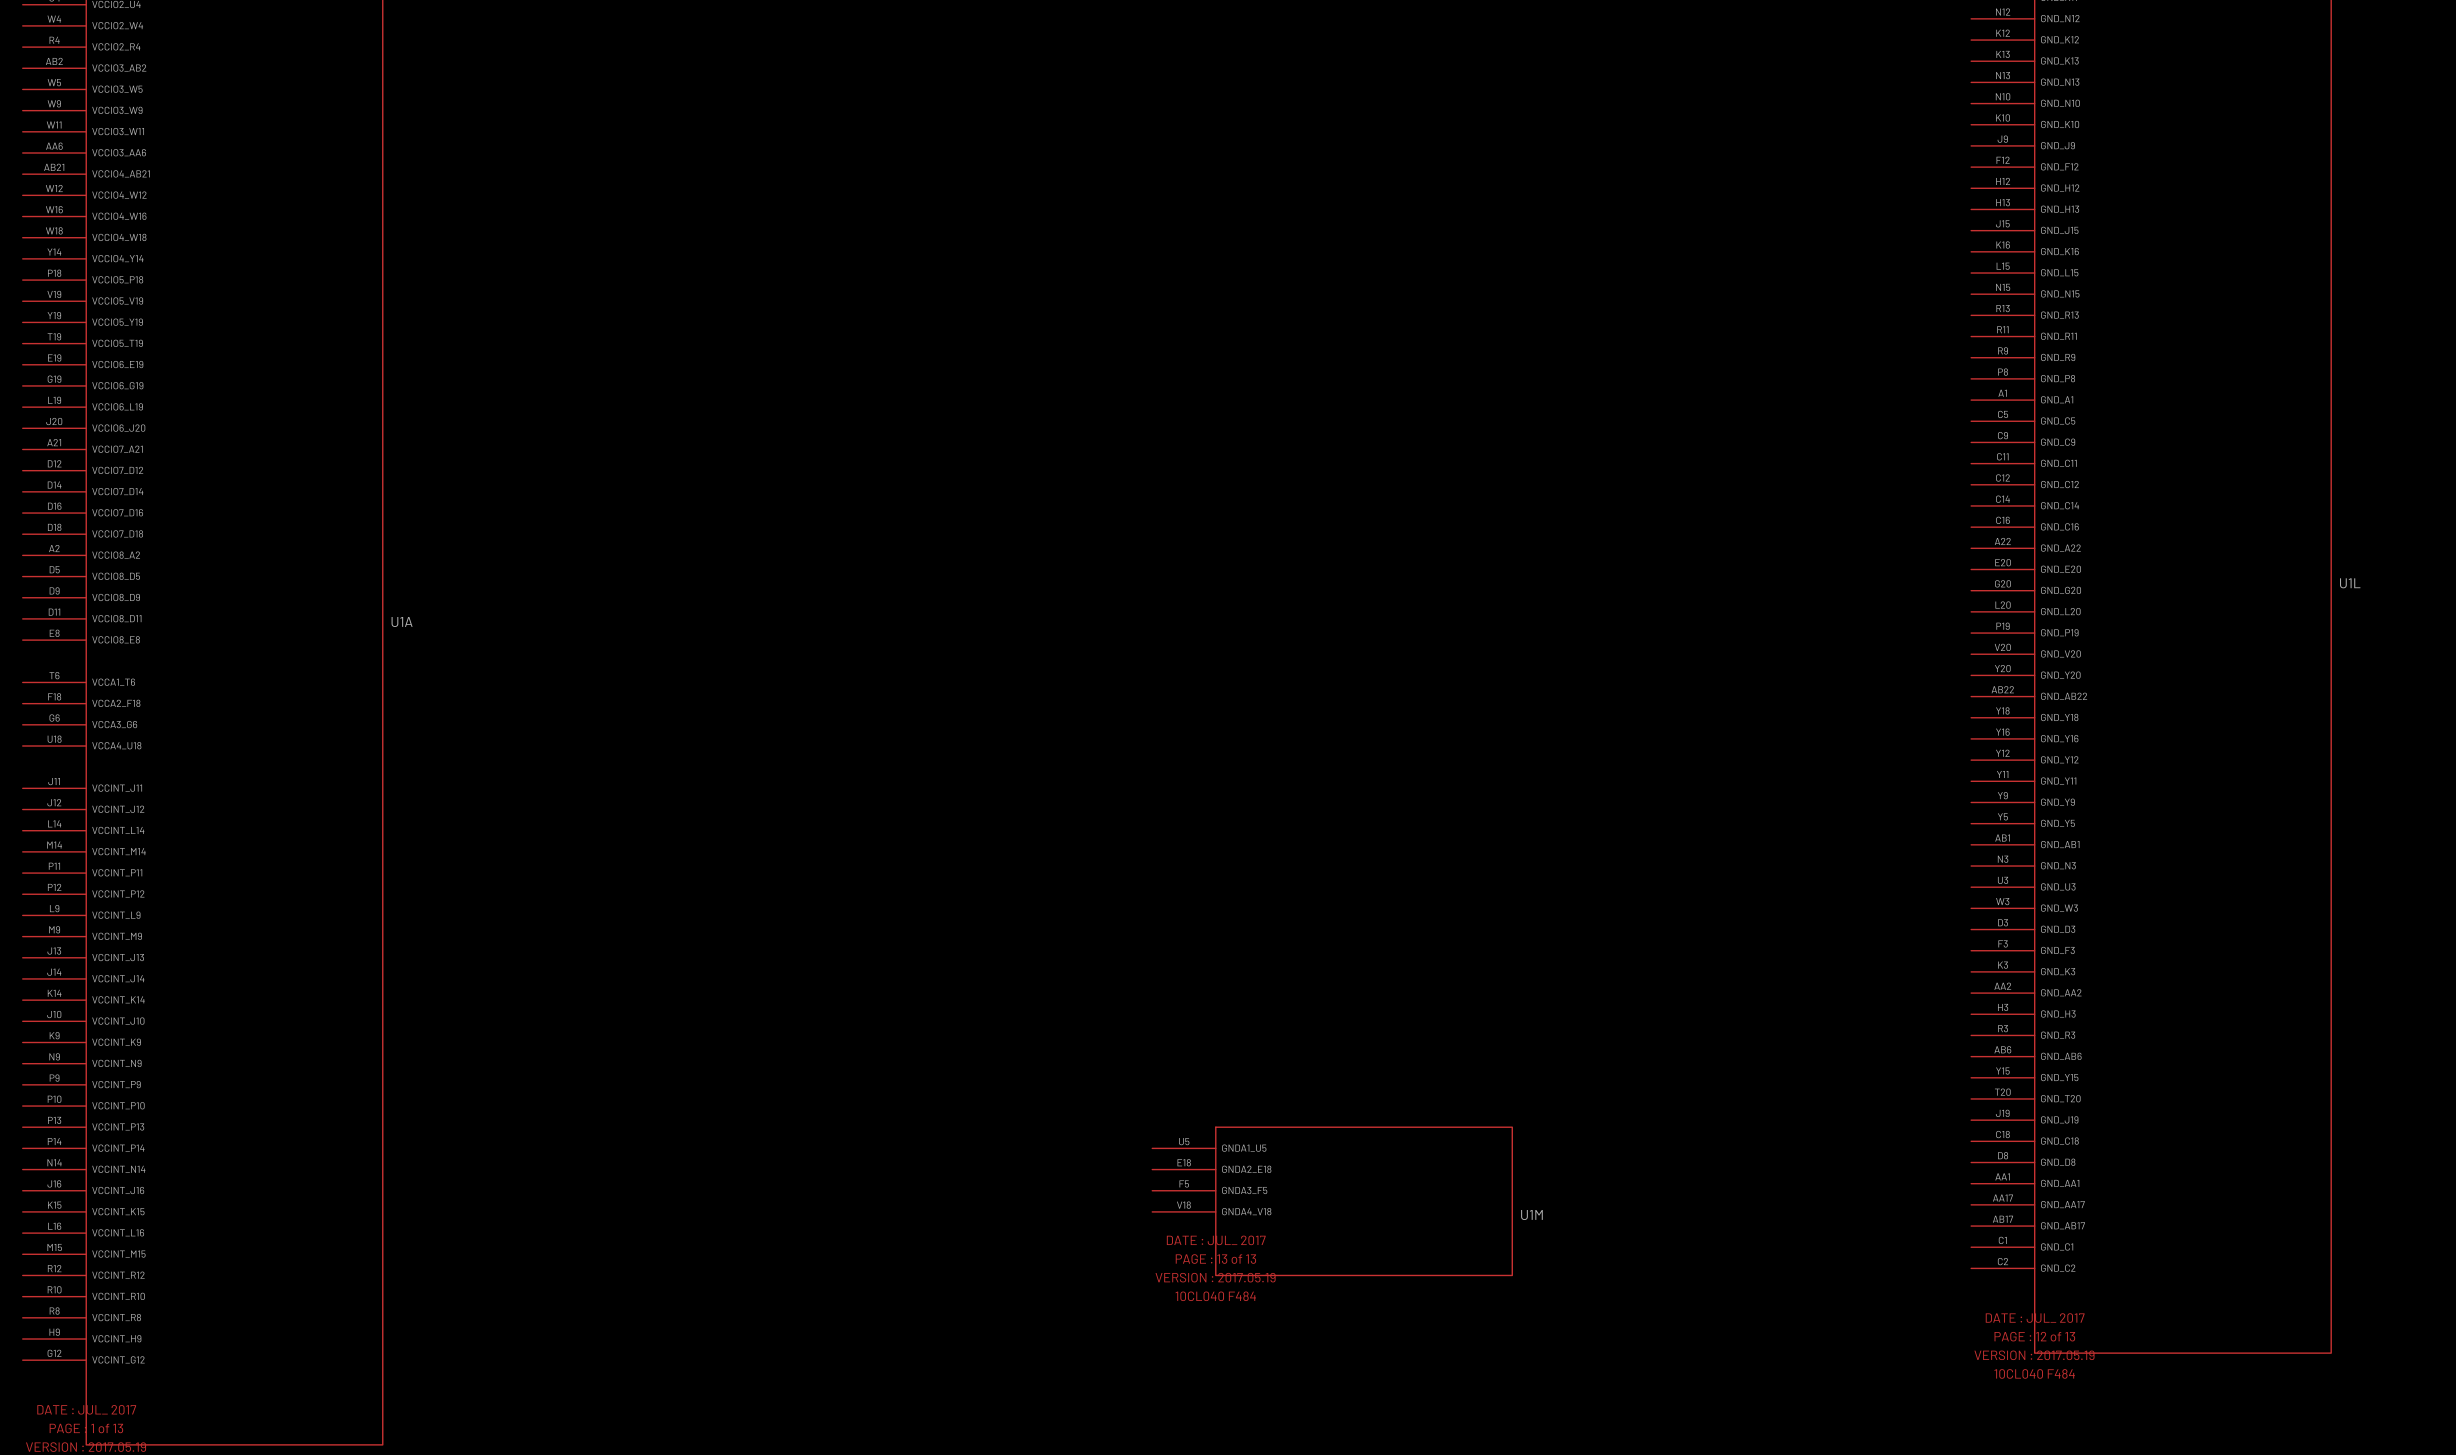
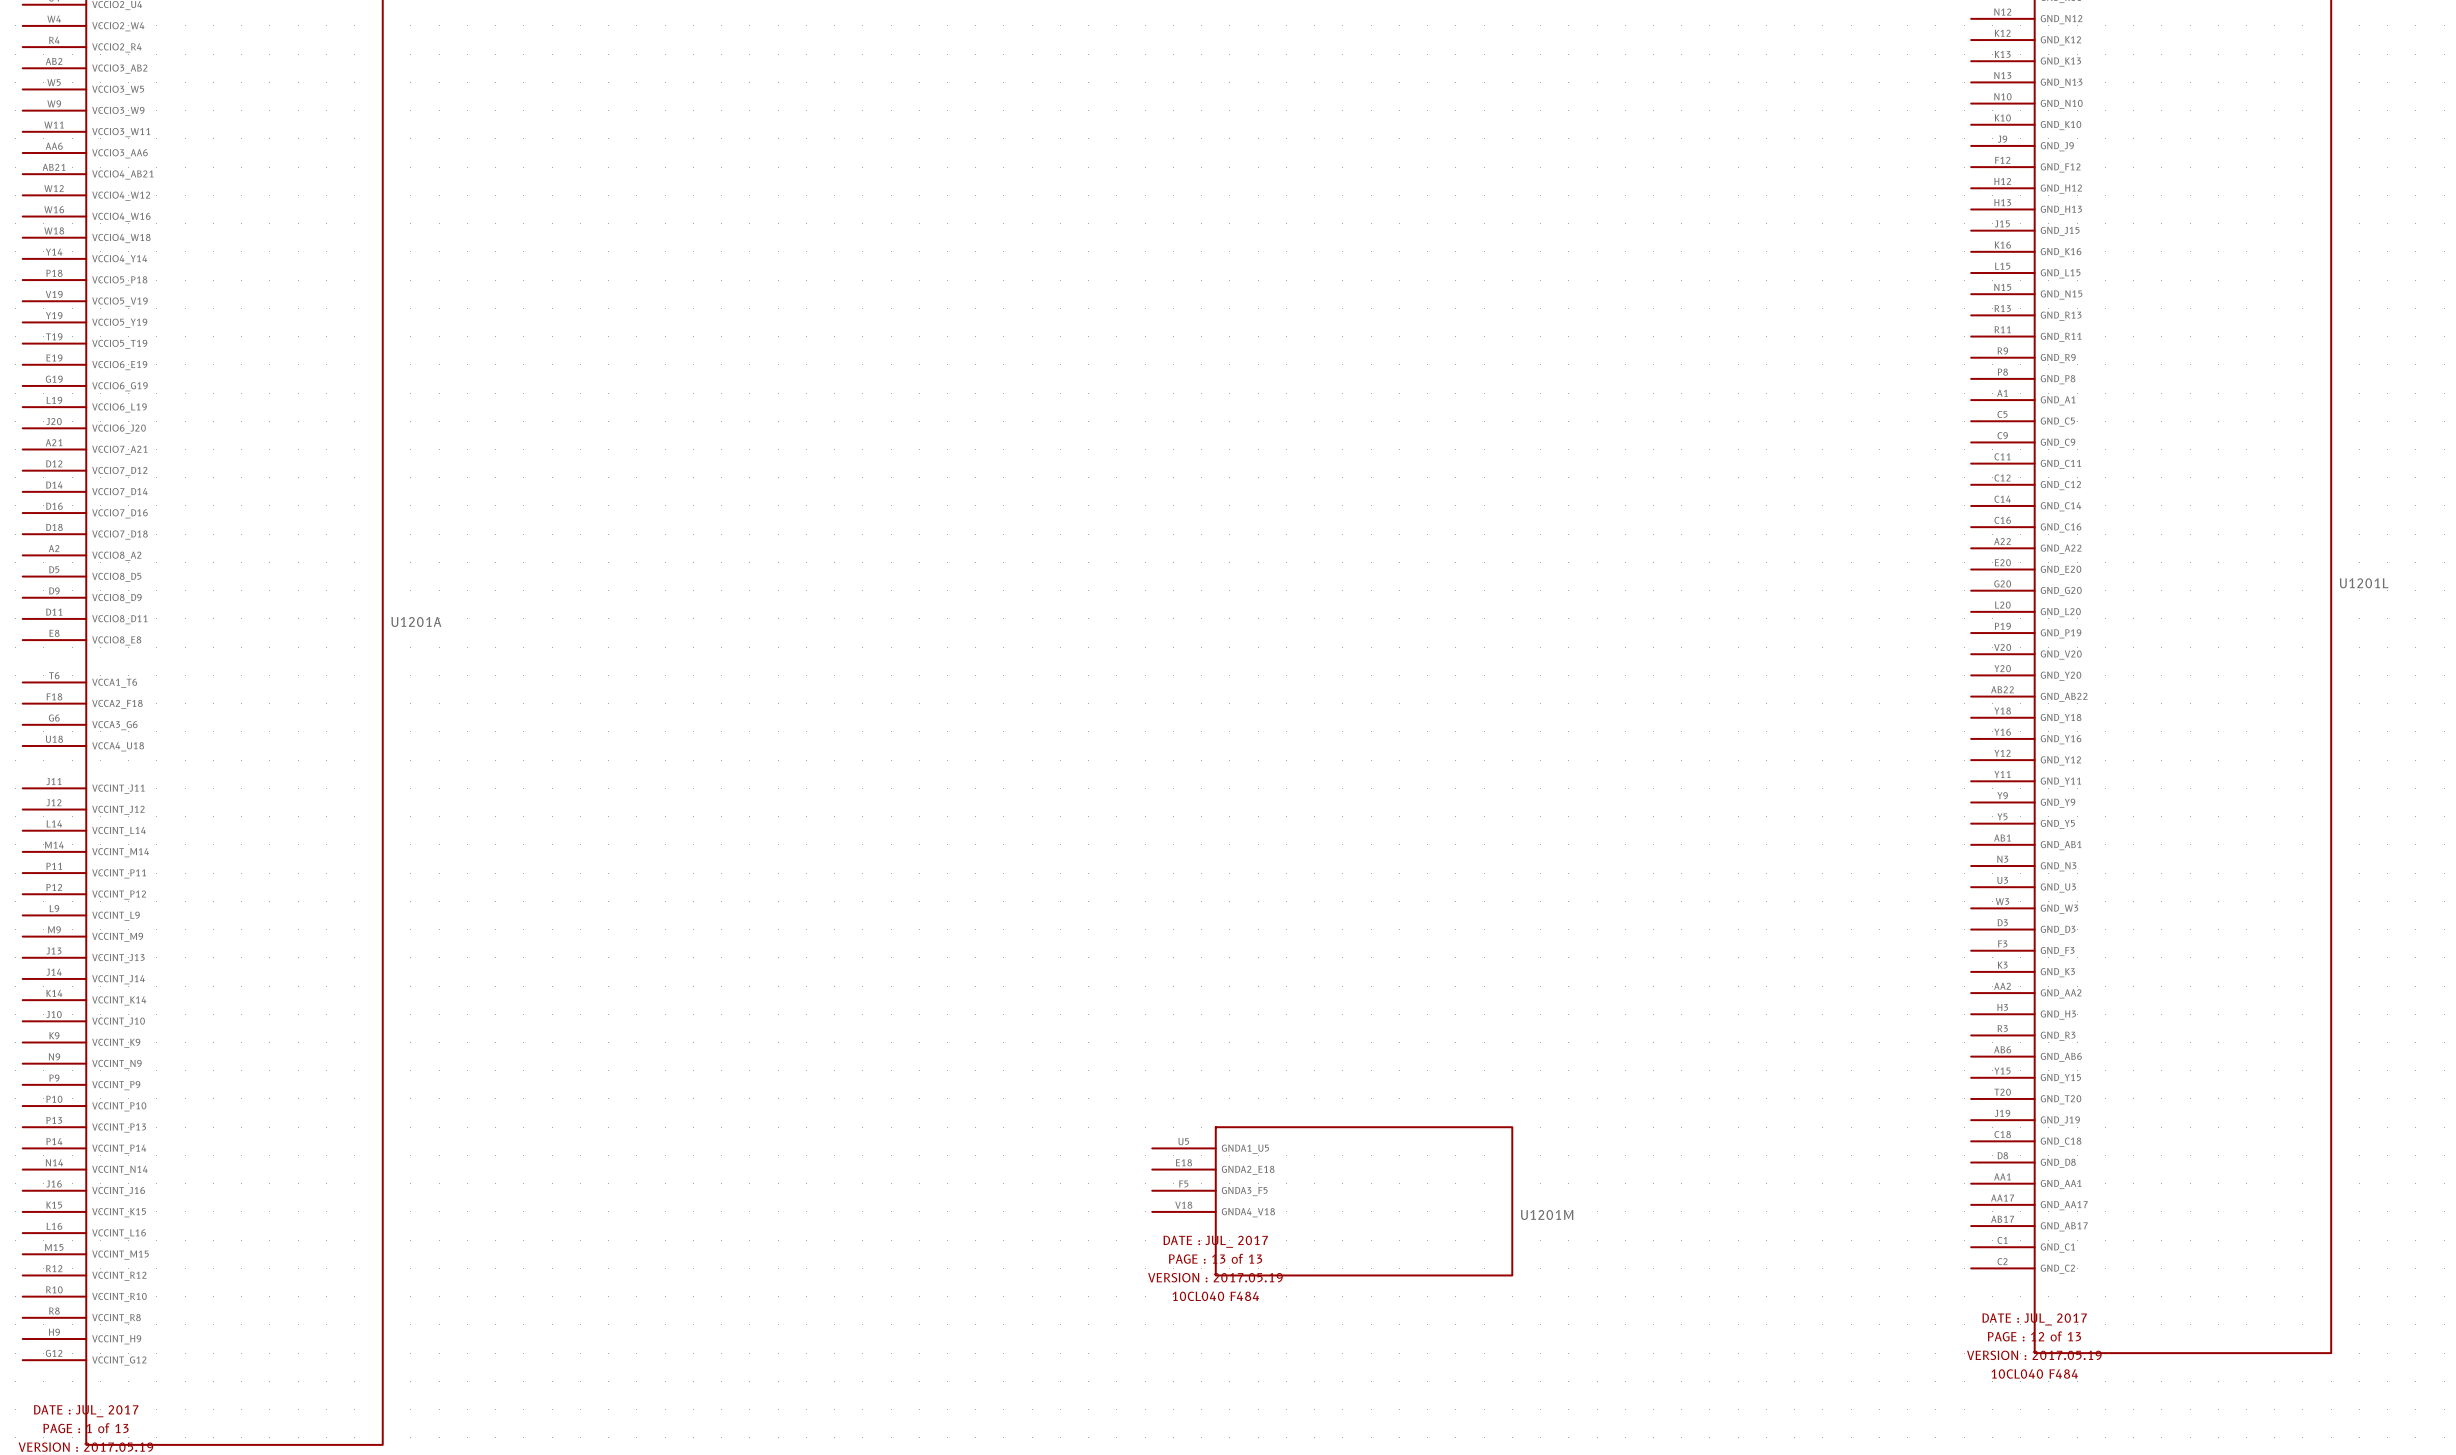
U1L name: U1L (2350, 583) -> U1201L (2364, 583)
U1A name: U1A (402, 622) -> U1201A (416, 622)
U1M name: U1M (1531, 1215) -> U1201M (1547, 1215)

